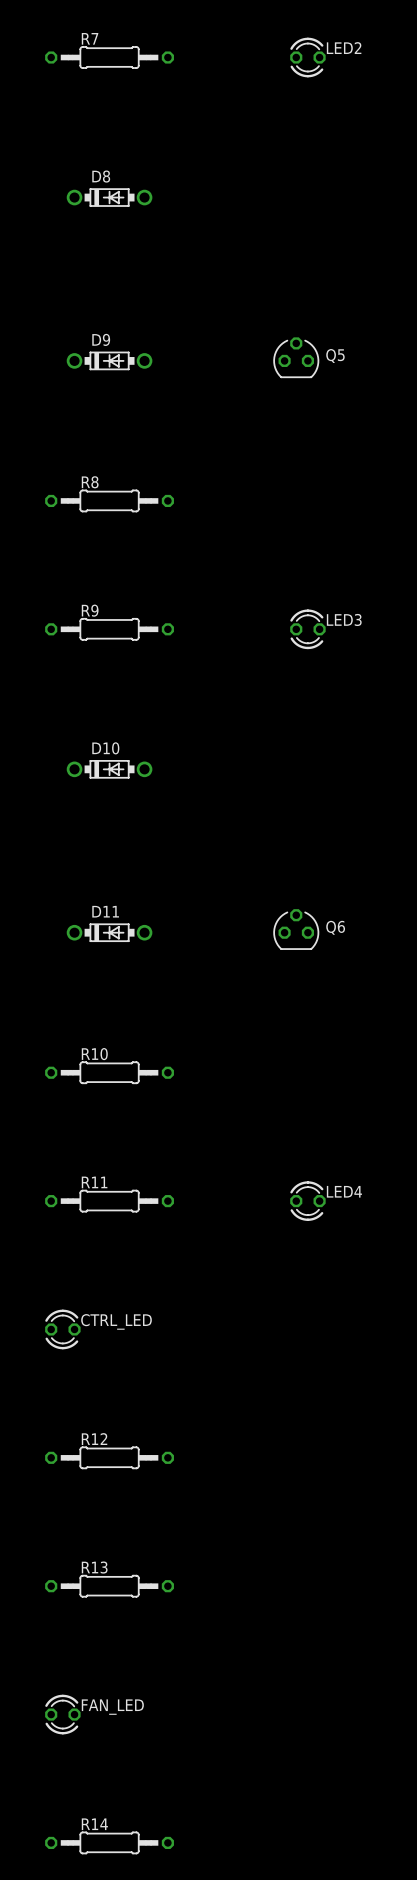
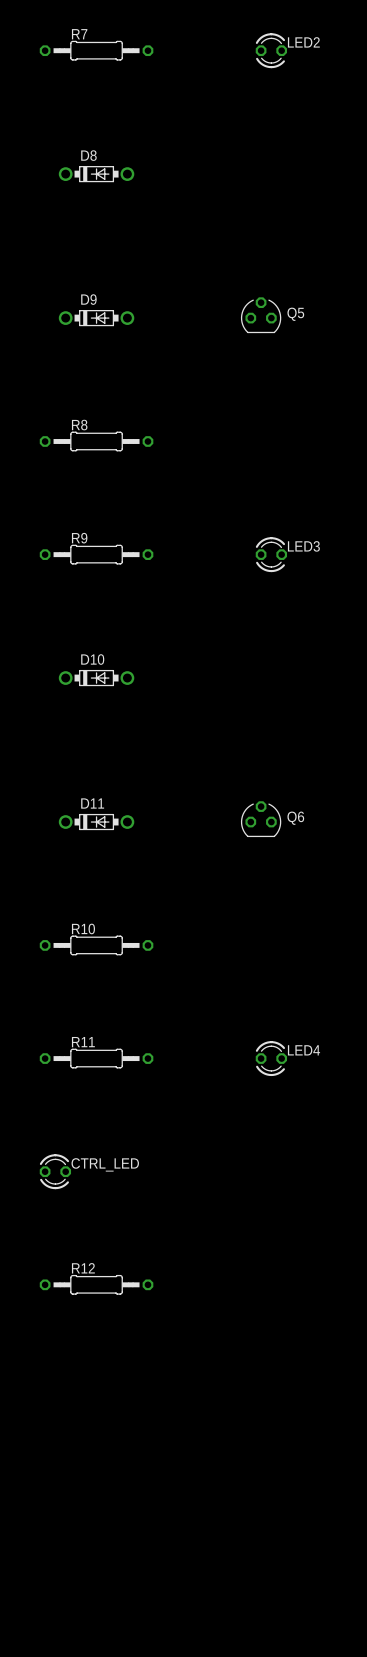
R13: (109, 1586) -> none
FAN_LED: (62, 1714) -> none
R14: (109, 1842) -> none

